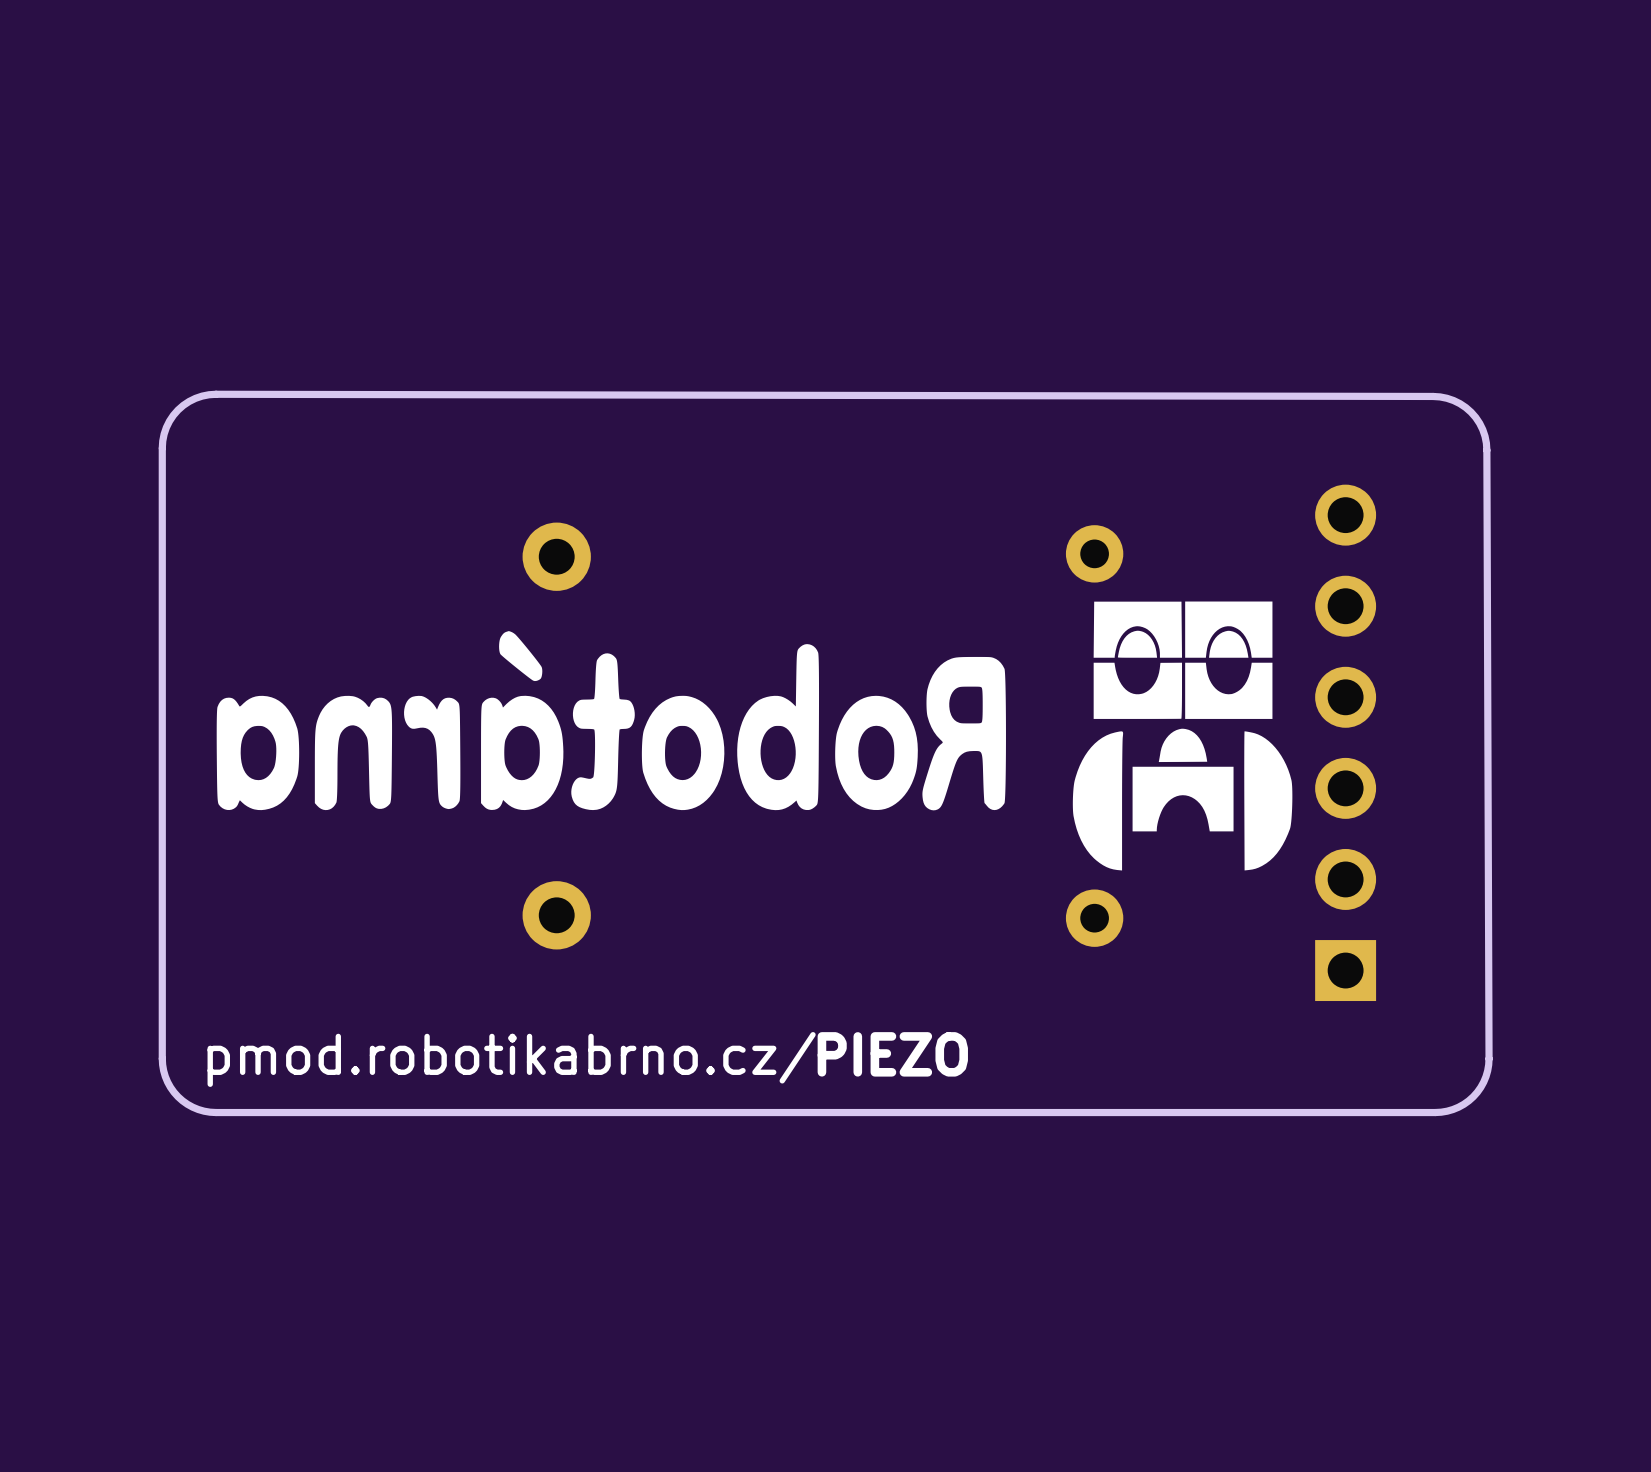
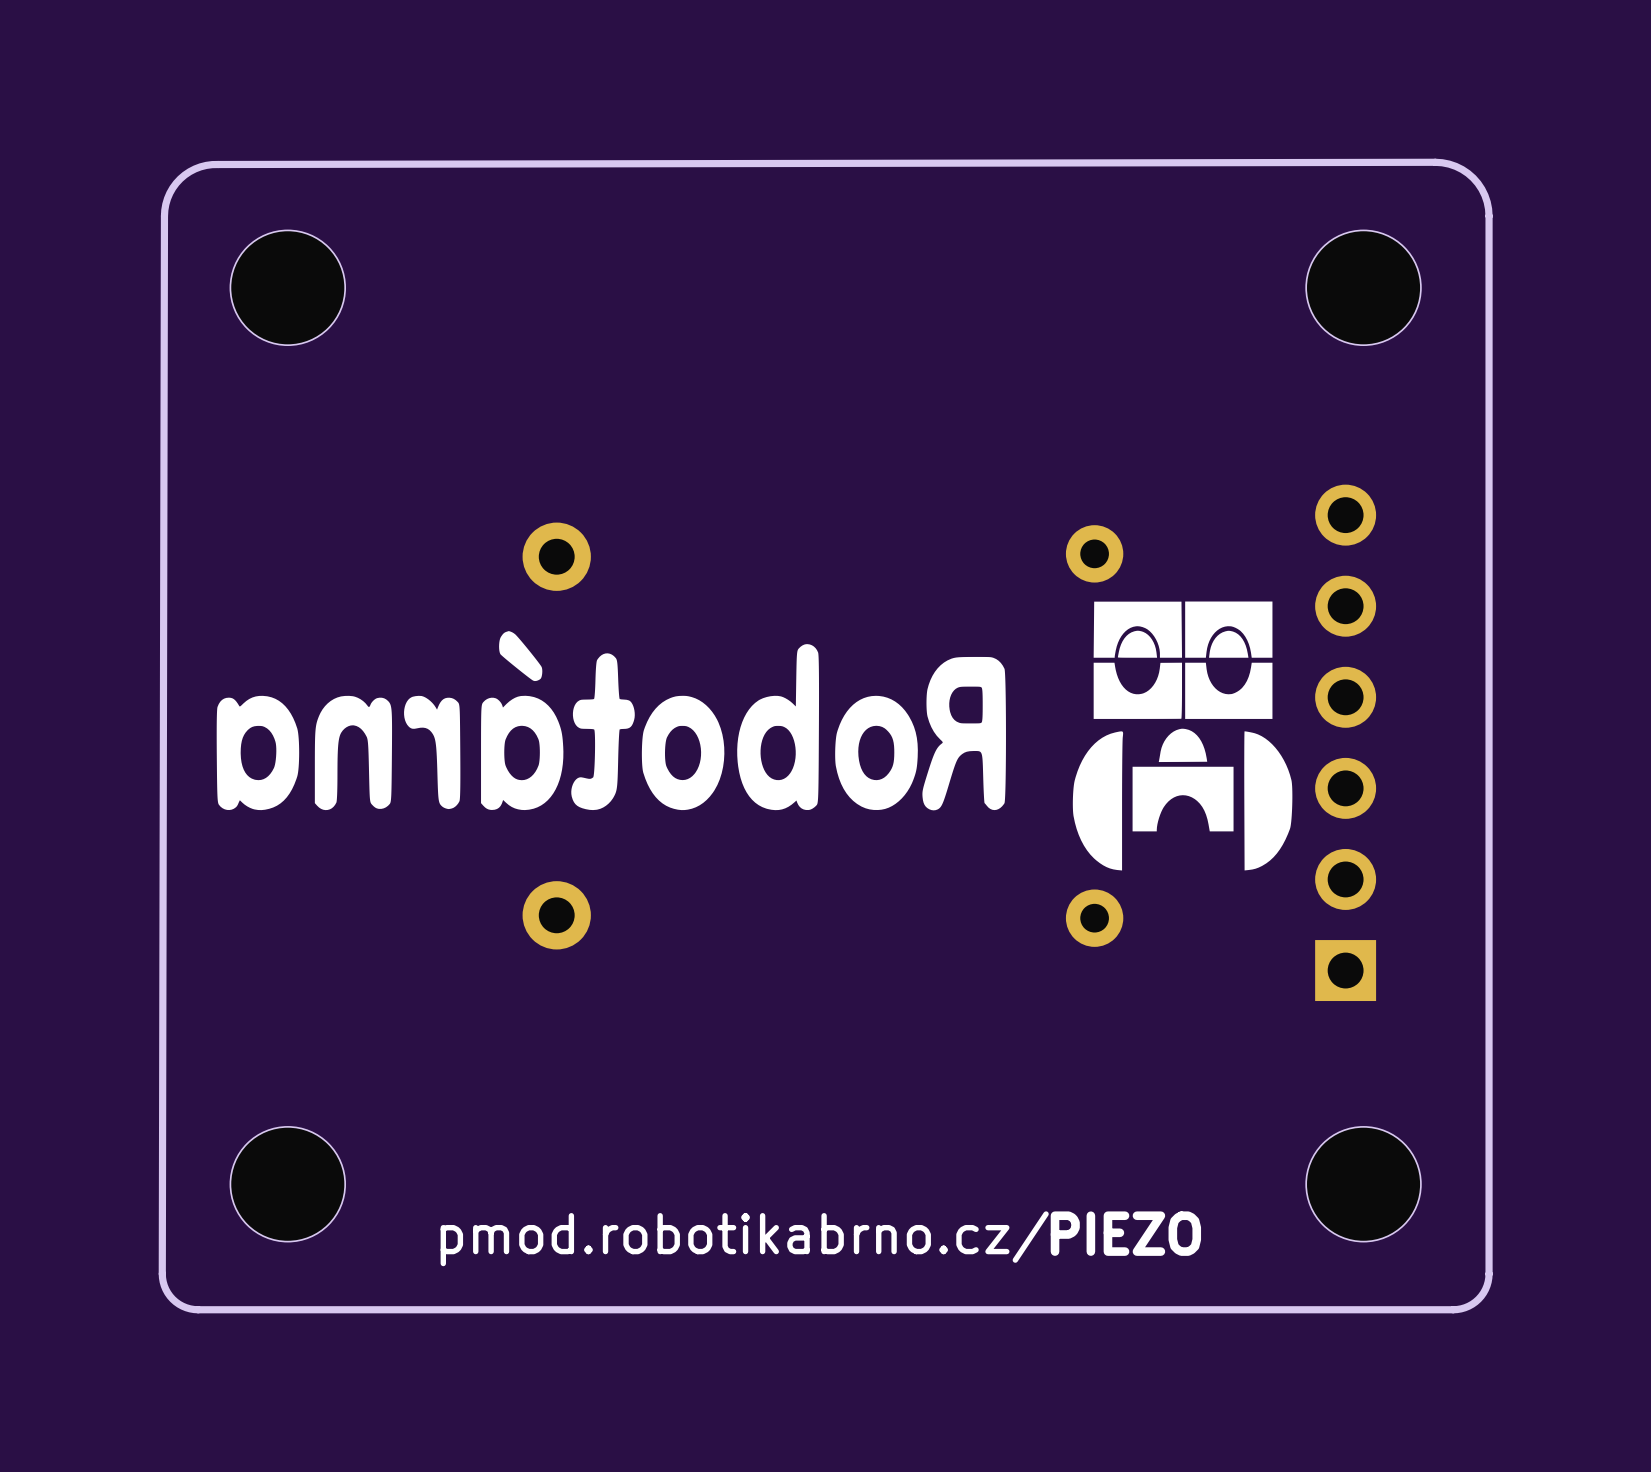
part: none -> (287, 287)
part: none -> (1363, 287)
board edge: (162, 448) (166, 427) (178, 410) (195, 398) (216, 394) (1433, 396) (1453, 400) (1465, 407) (1475, 417) (1482, 429) (1486, 450) (1489, 1058) (1483, 1082) (1477, 1092) (1463, 1104) (1453, 1109) (1435, 1112) (216, 1112) (192, 1107) (182, 1100) (170, 1087) (165, 1076) (162, 1058) (162, 448) -> (1435, 162) (1455, 166) (1473, 178) (1484, 195) (1489, 216) (1489, 1273) (1487, 1285) (1478, 1299) (1468, 1306) (1453, 1309) (198, 1309) (182, 1306) (172, 1299) (165, 1289) (162, 1273) (164, 216) (167, 198) (180, 178) (200, 166) (218, 164) (1435, 162)
text position: PIEZO (892, 1054) -> PIEZO (1125, 1233)
text position: pmod.robotikabrno.cz/ (511, 1059) -> pmod.robotikabrno.cz/ (744, 1238)
part: none -> (287, 1184)
part: none -> (1363, 1184)

